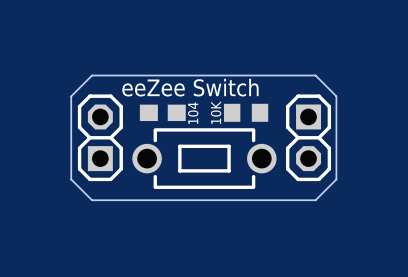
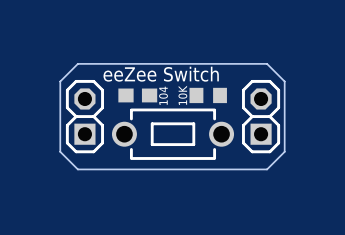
part rotation: 0° (308, 137) -> 180° (261, 116)

